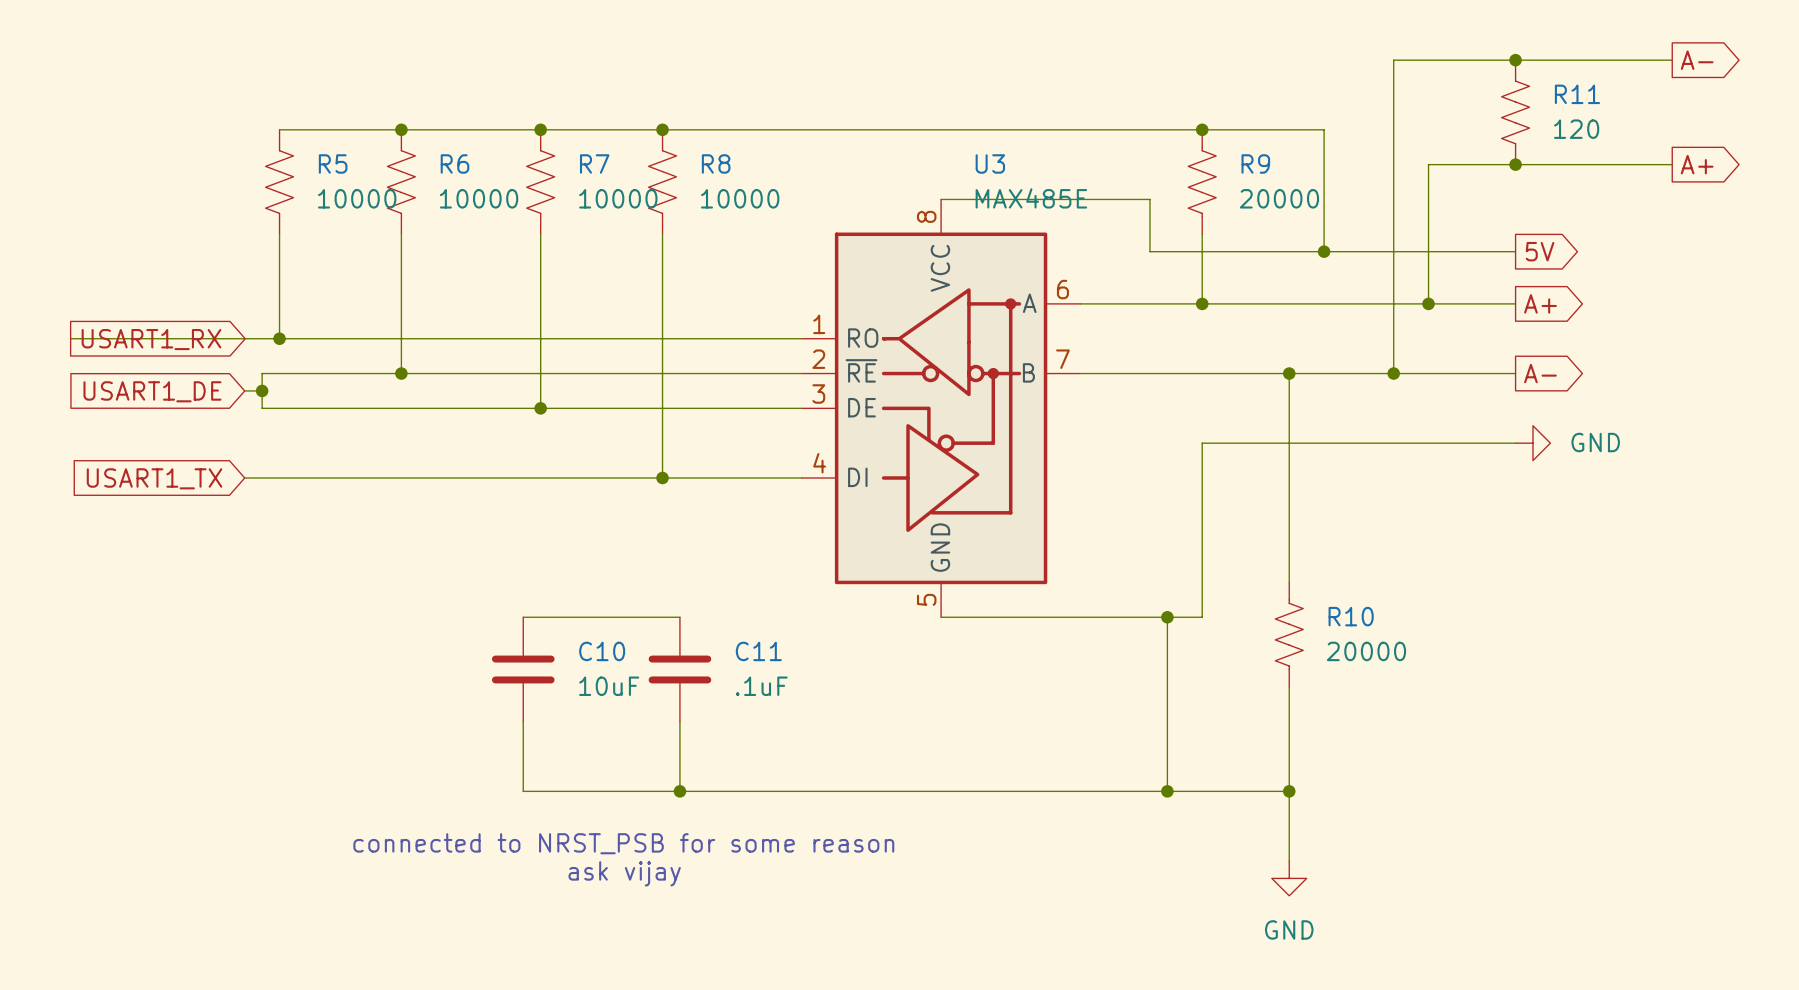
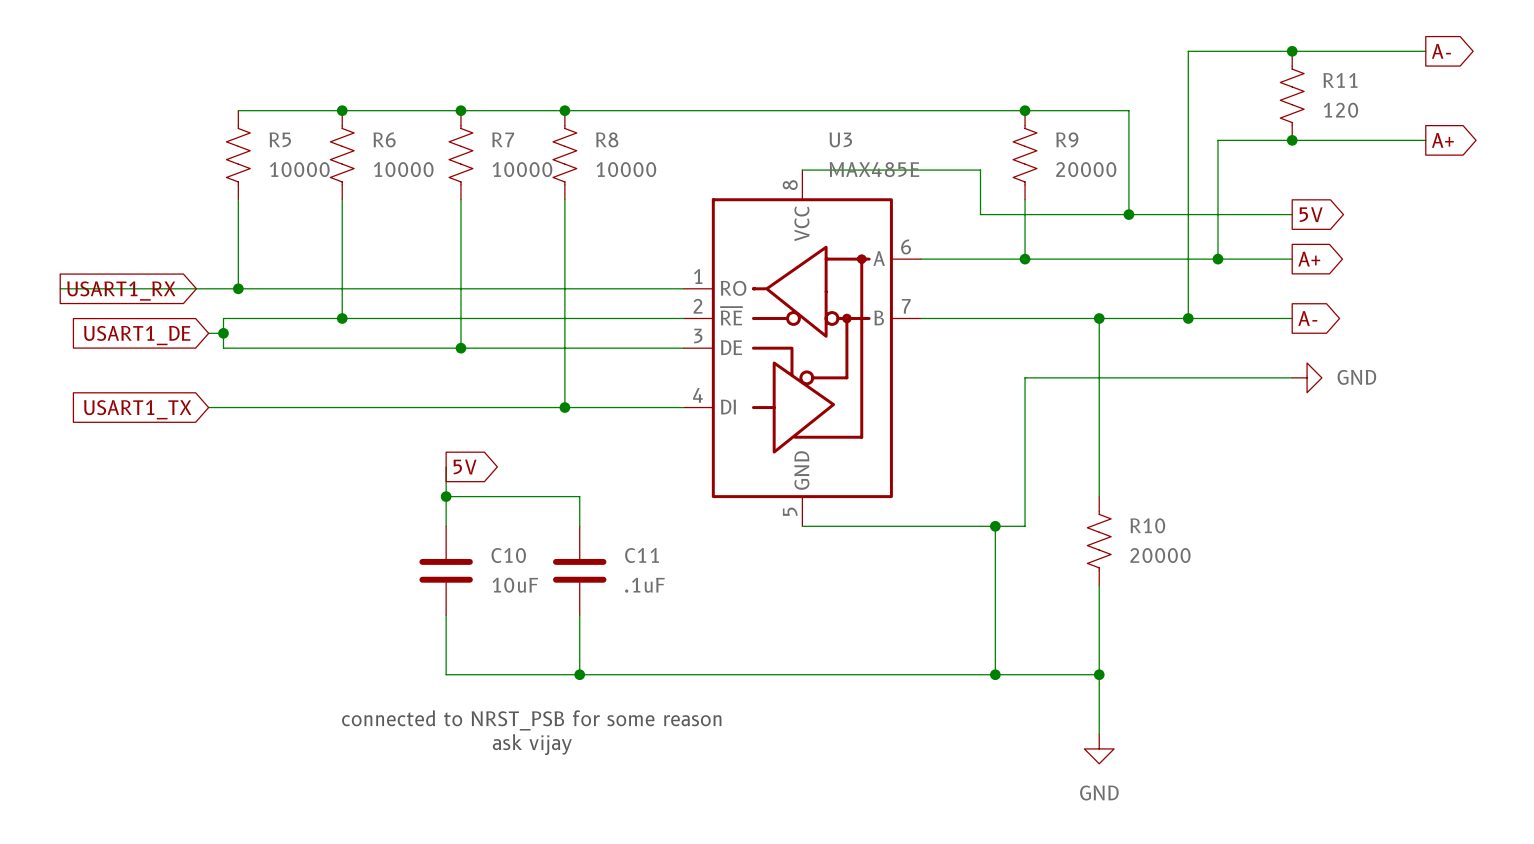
wire: none -> (446, 466) (446, 526)
global label: none -> 5V (465, 467)
junction: none -> (446, 496)
wire: (523, 617) (679, 617) -> (446, 496) (579, 496) (579, 526)

